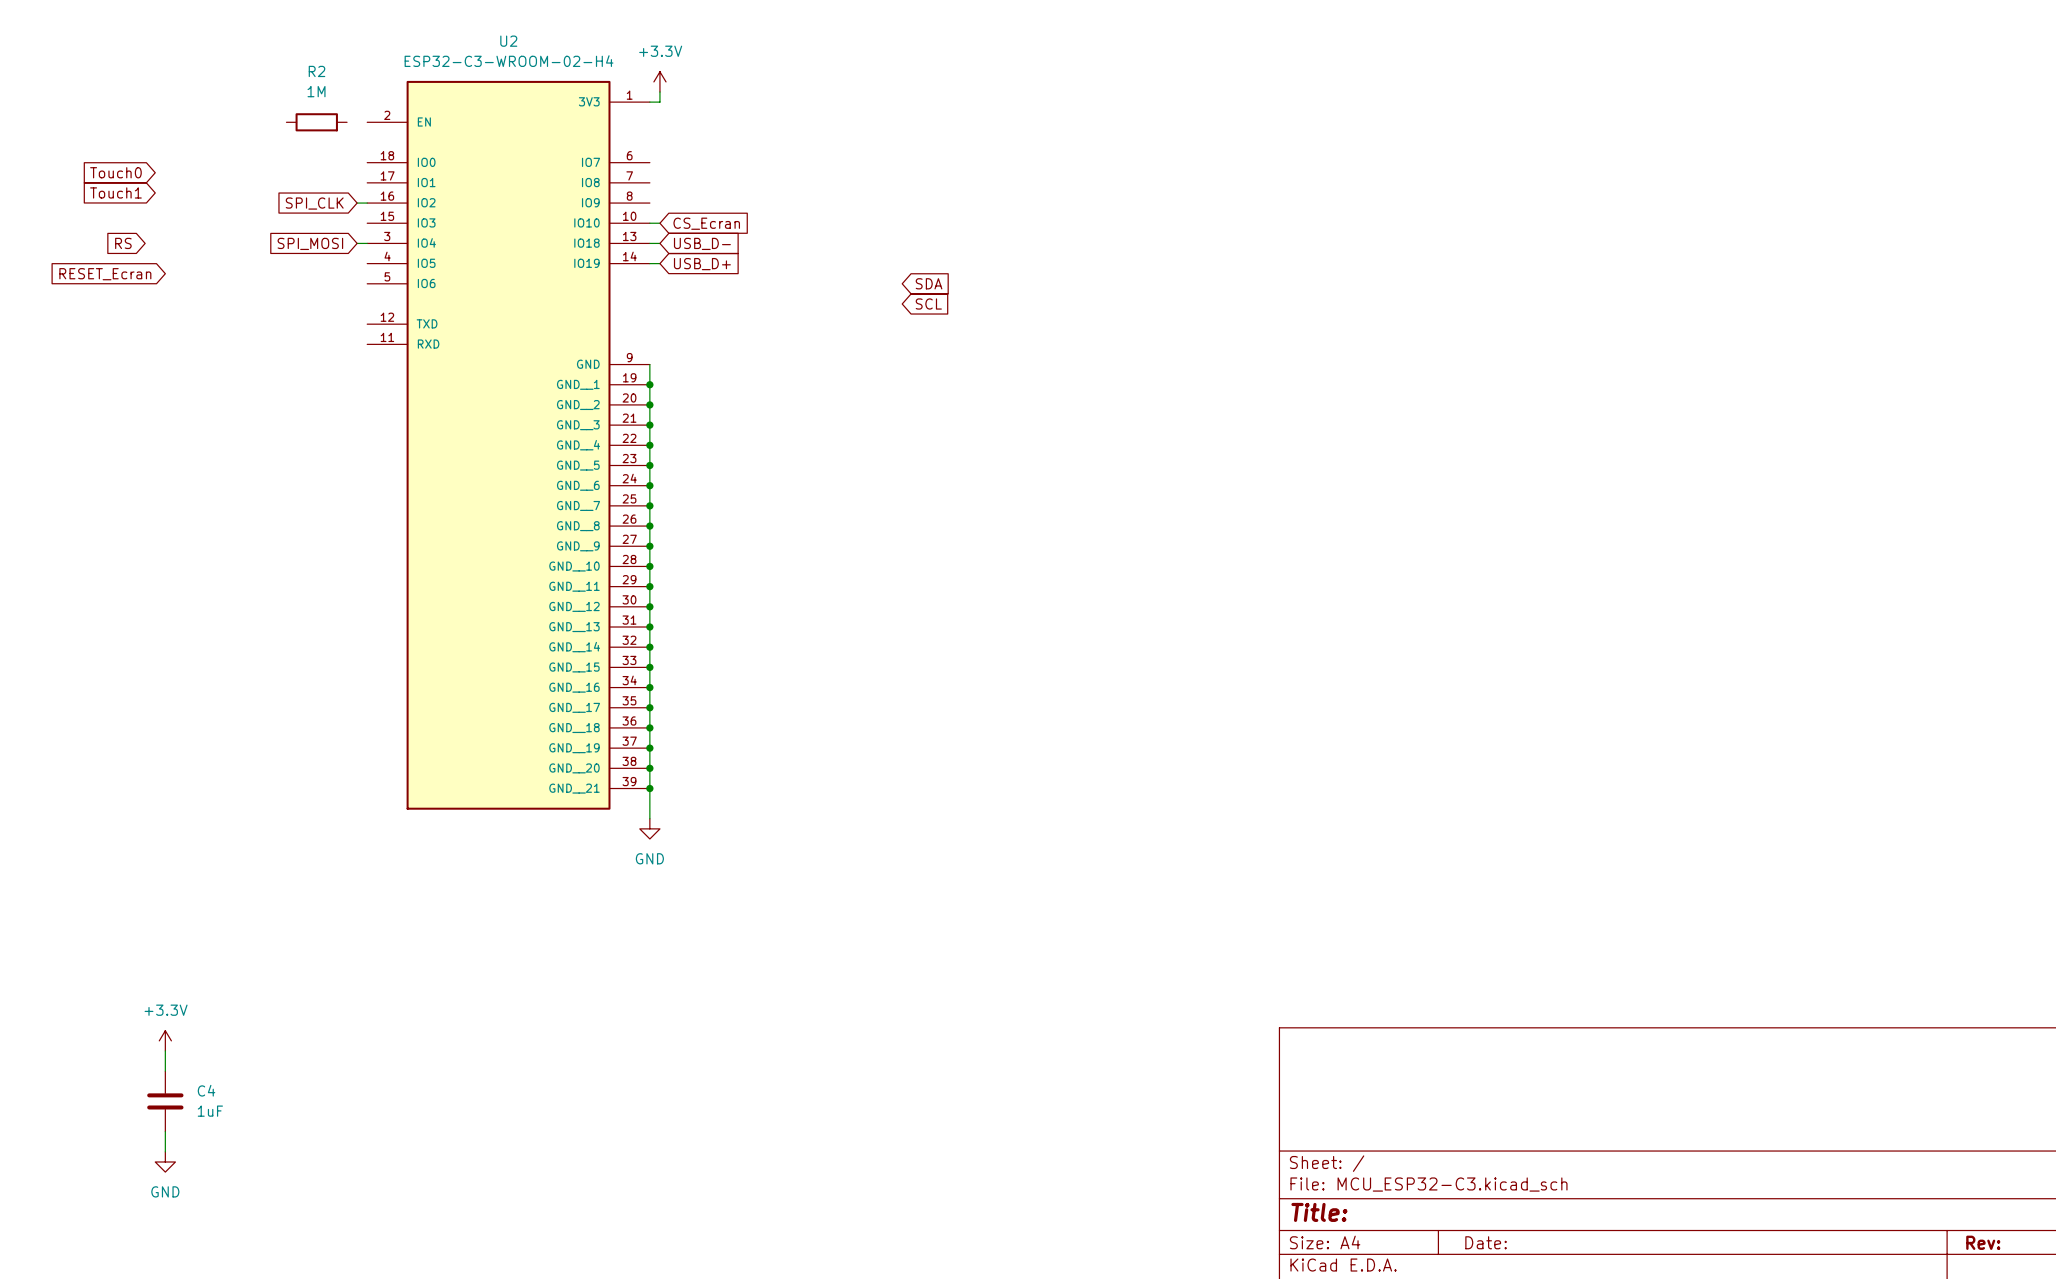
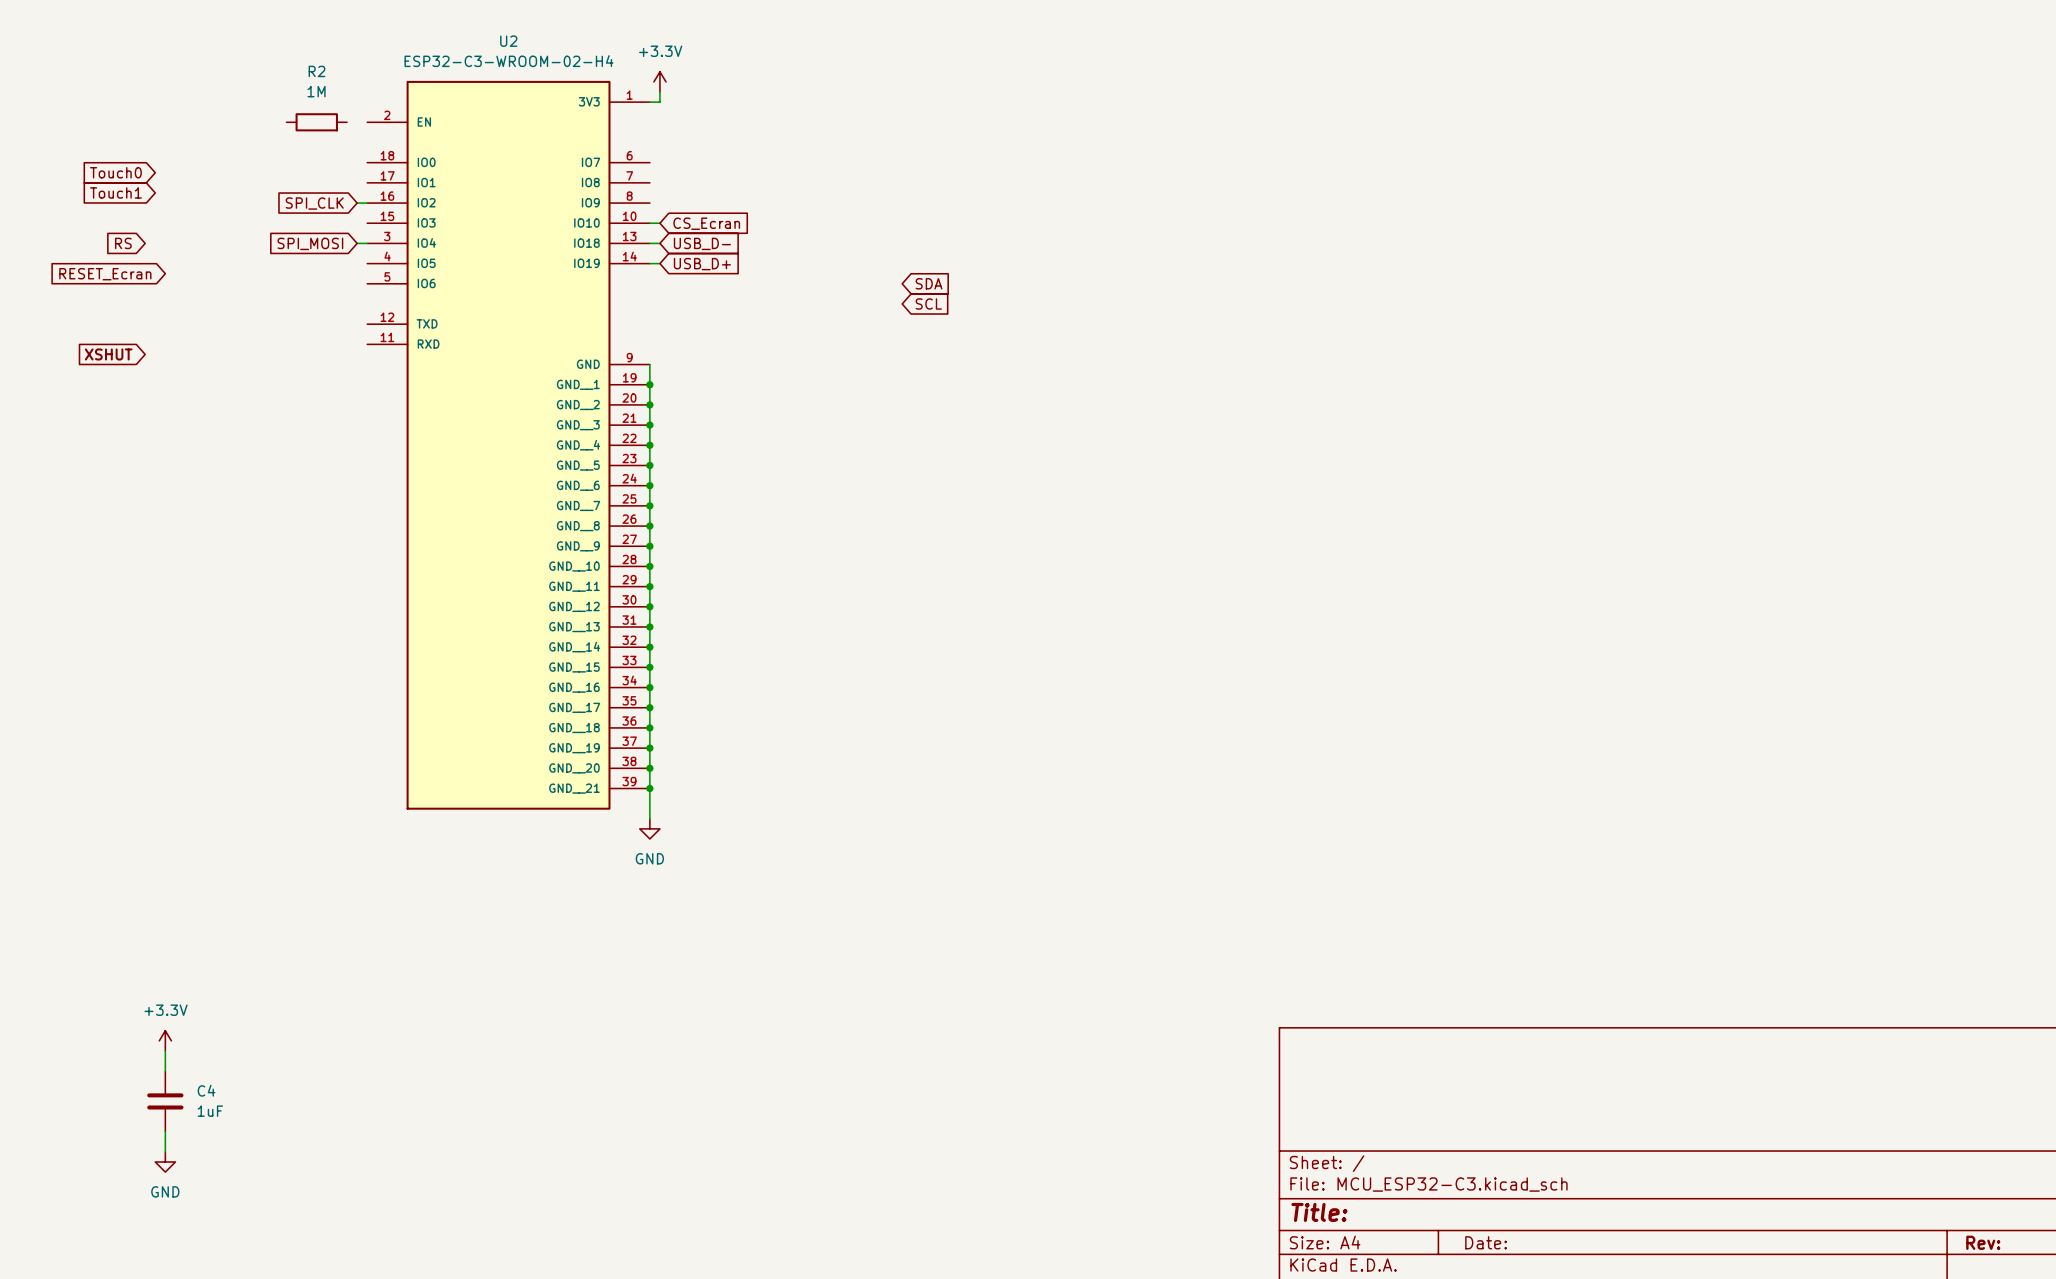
global label: none -> XSHUT (108, 354)

